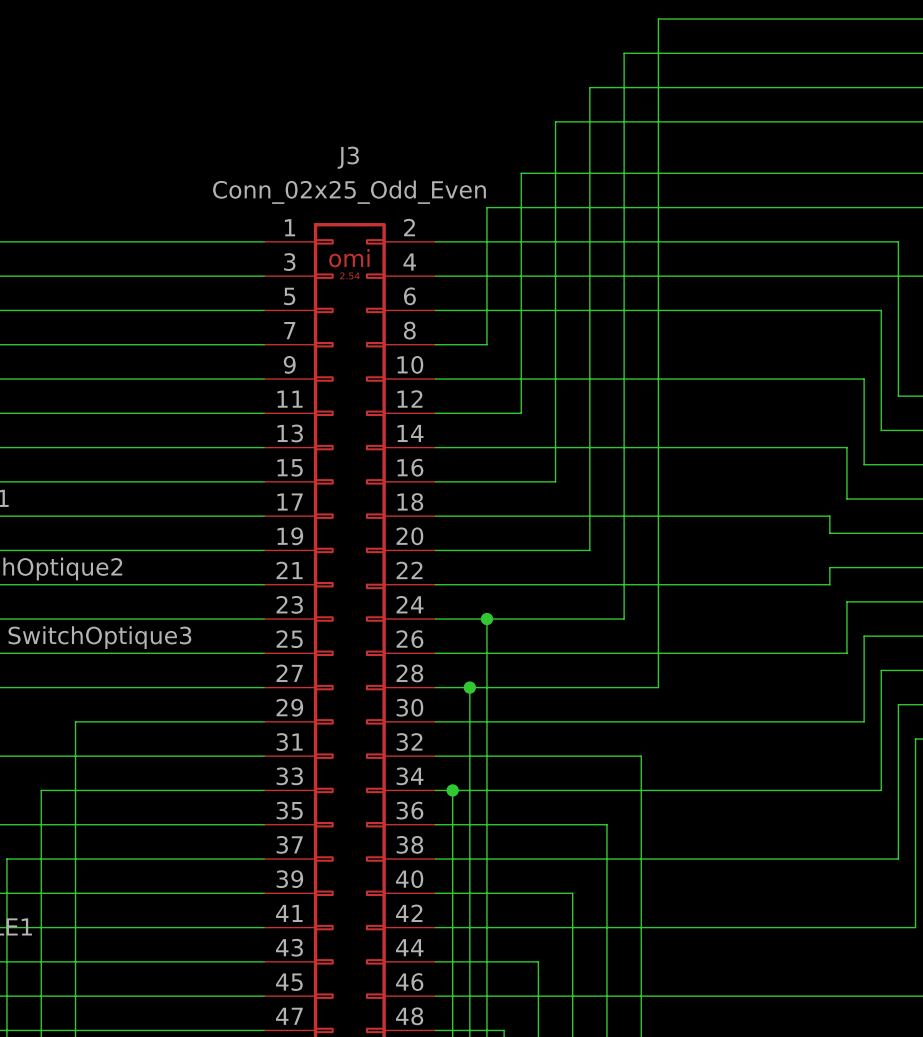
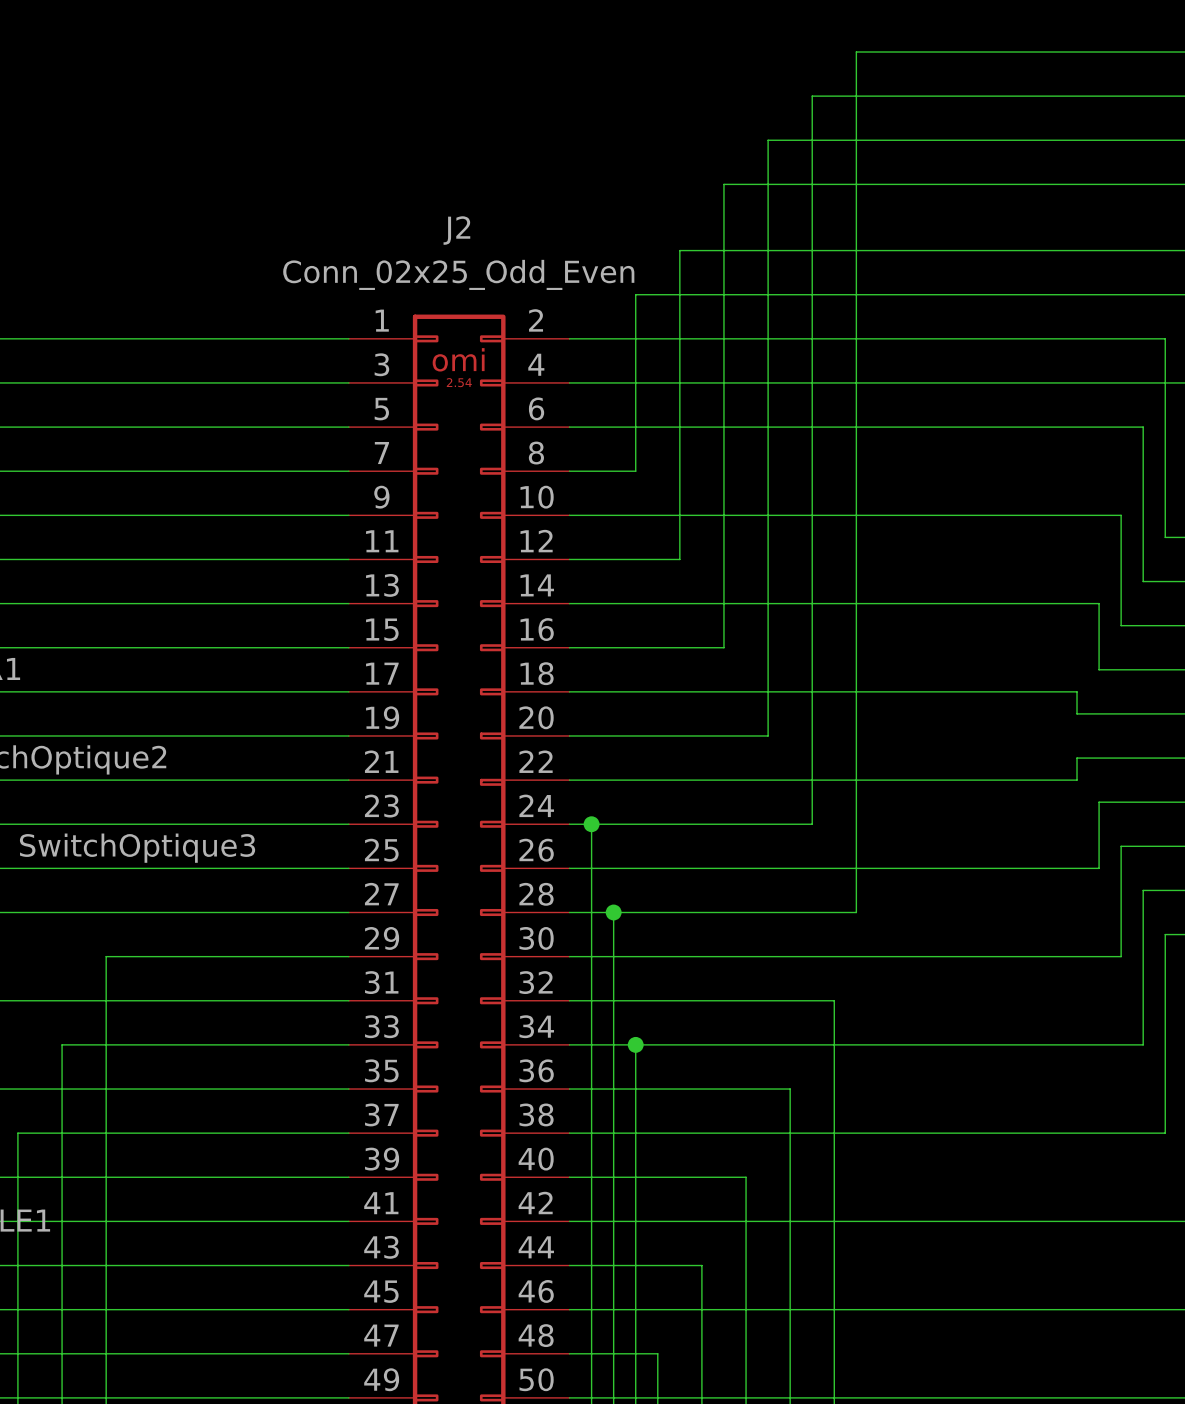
J3 name: J3 (348, 157) -> J2 (456, 230)
wire: (486, 619) (486, 790) -> (591, 824) (591, 1044)
junction position: (486, 619) -> (591, 824)
junction position: (452, 790) -> (635, 1044)

